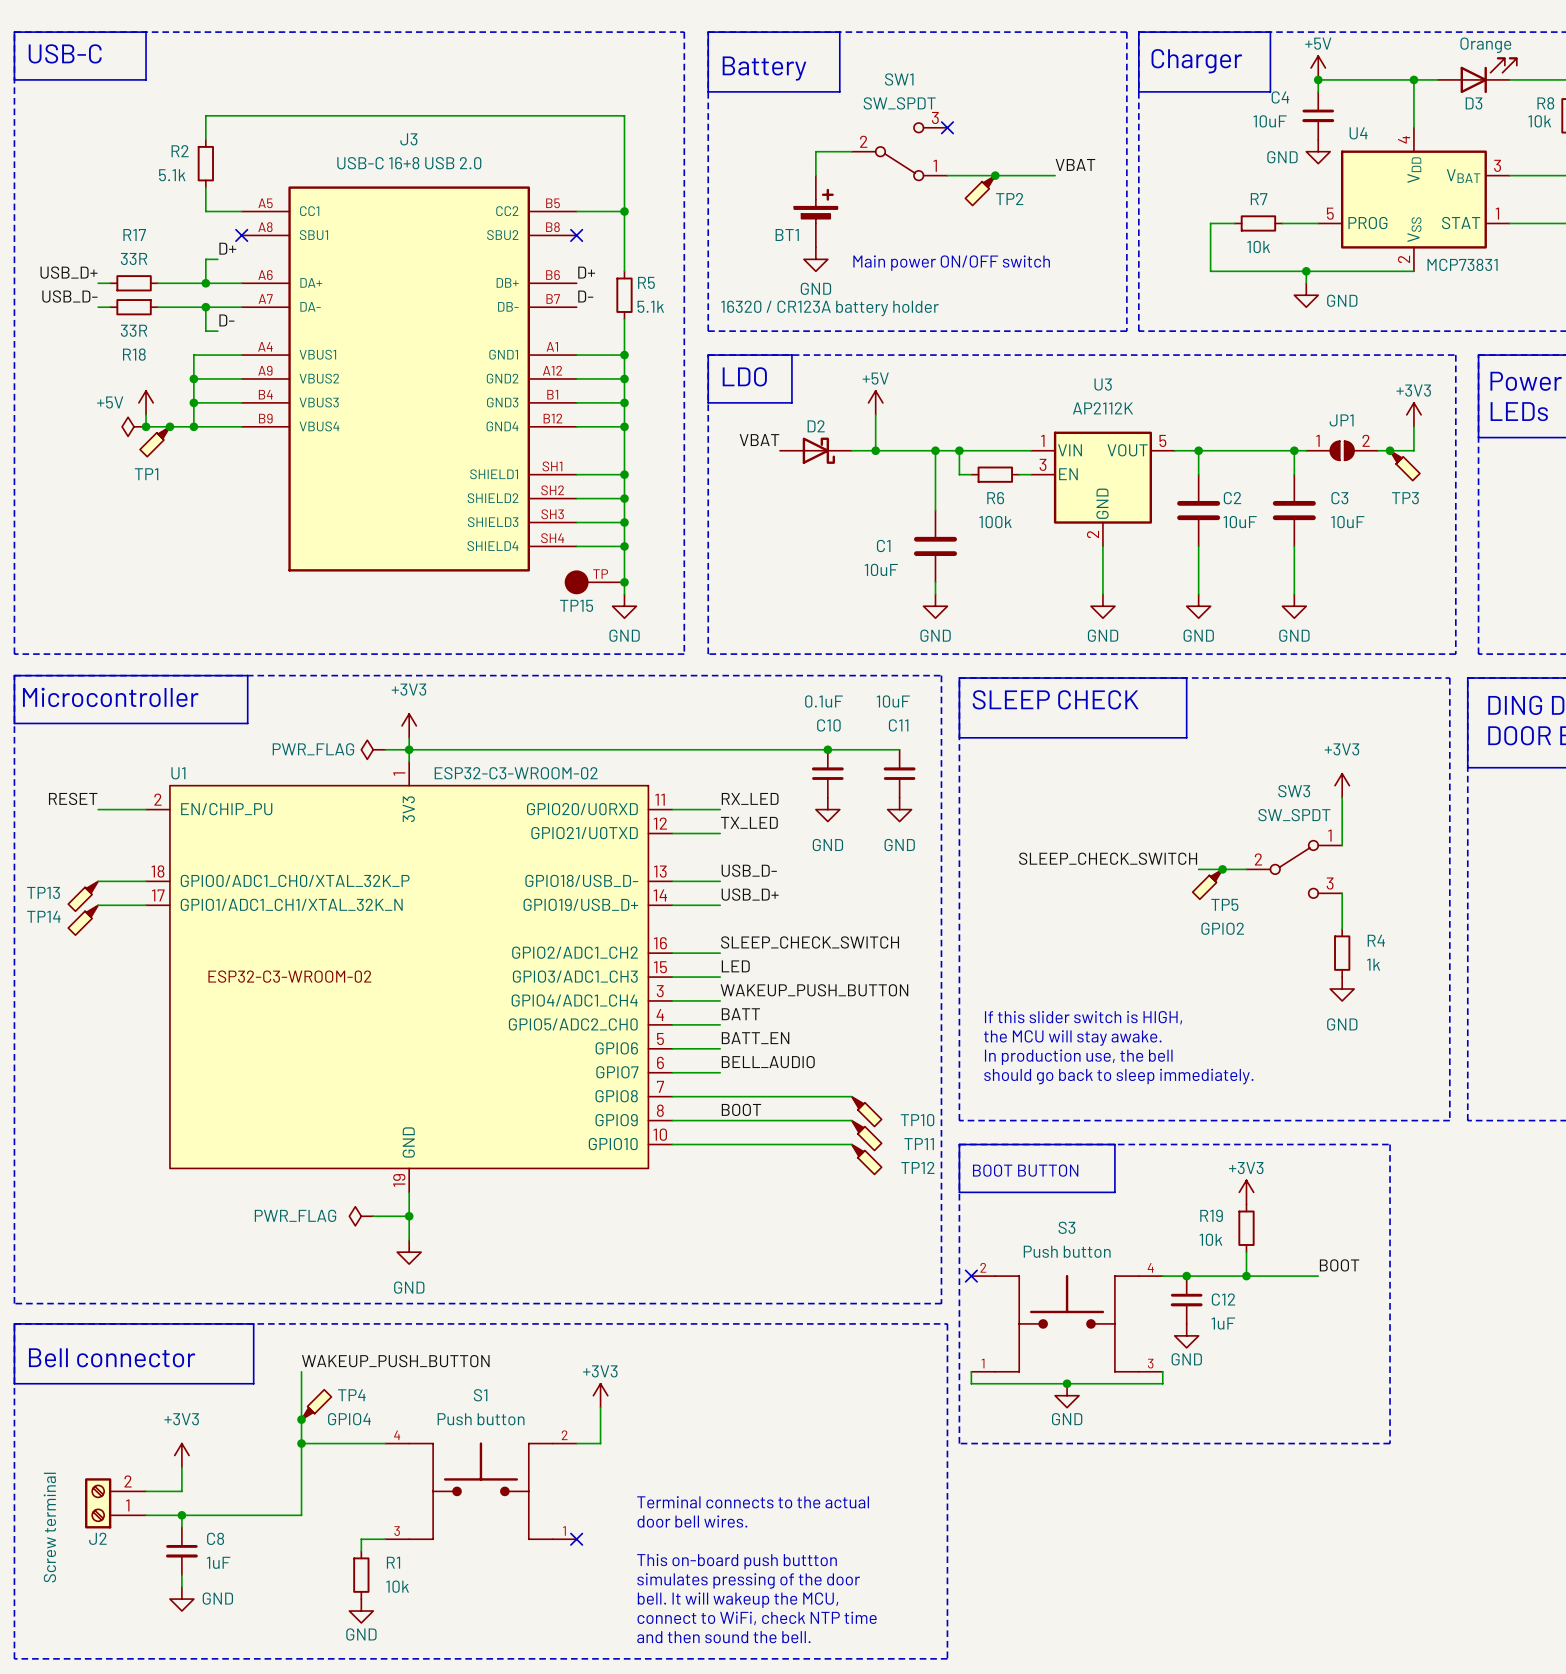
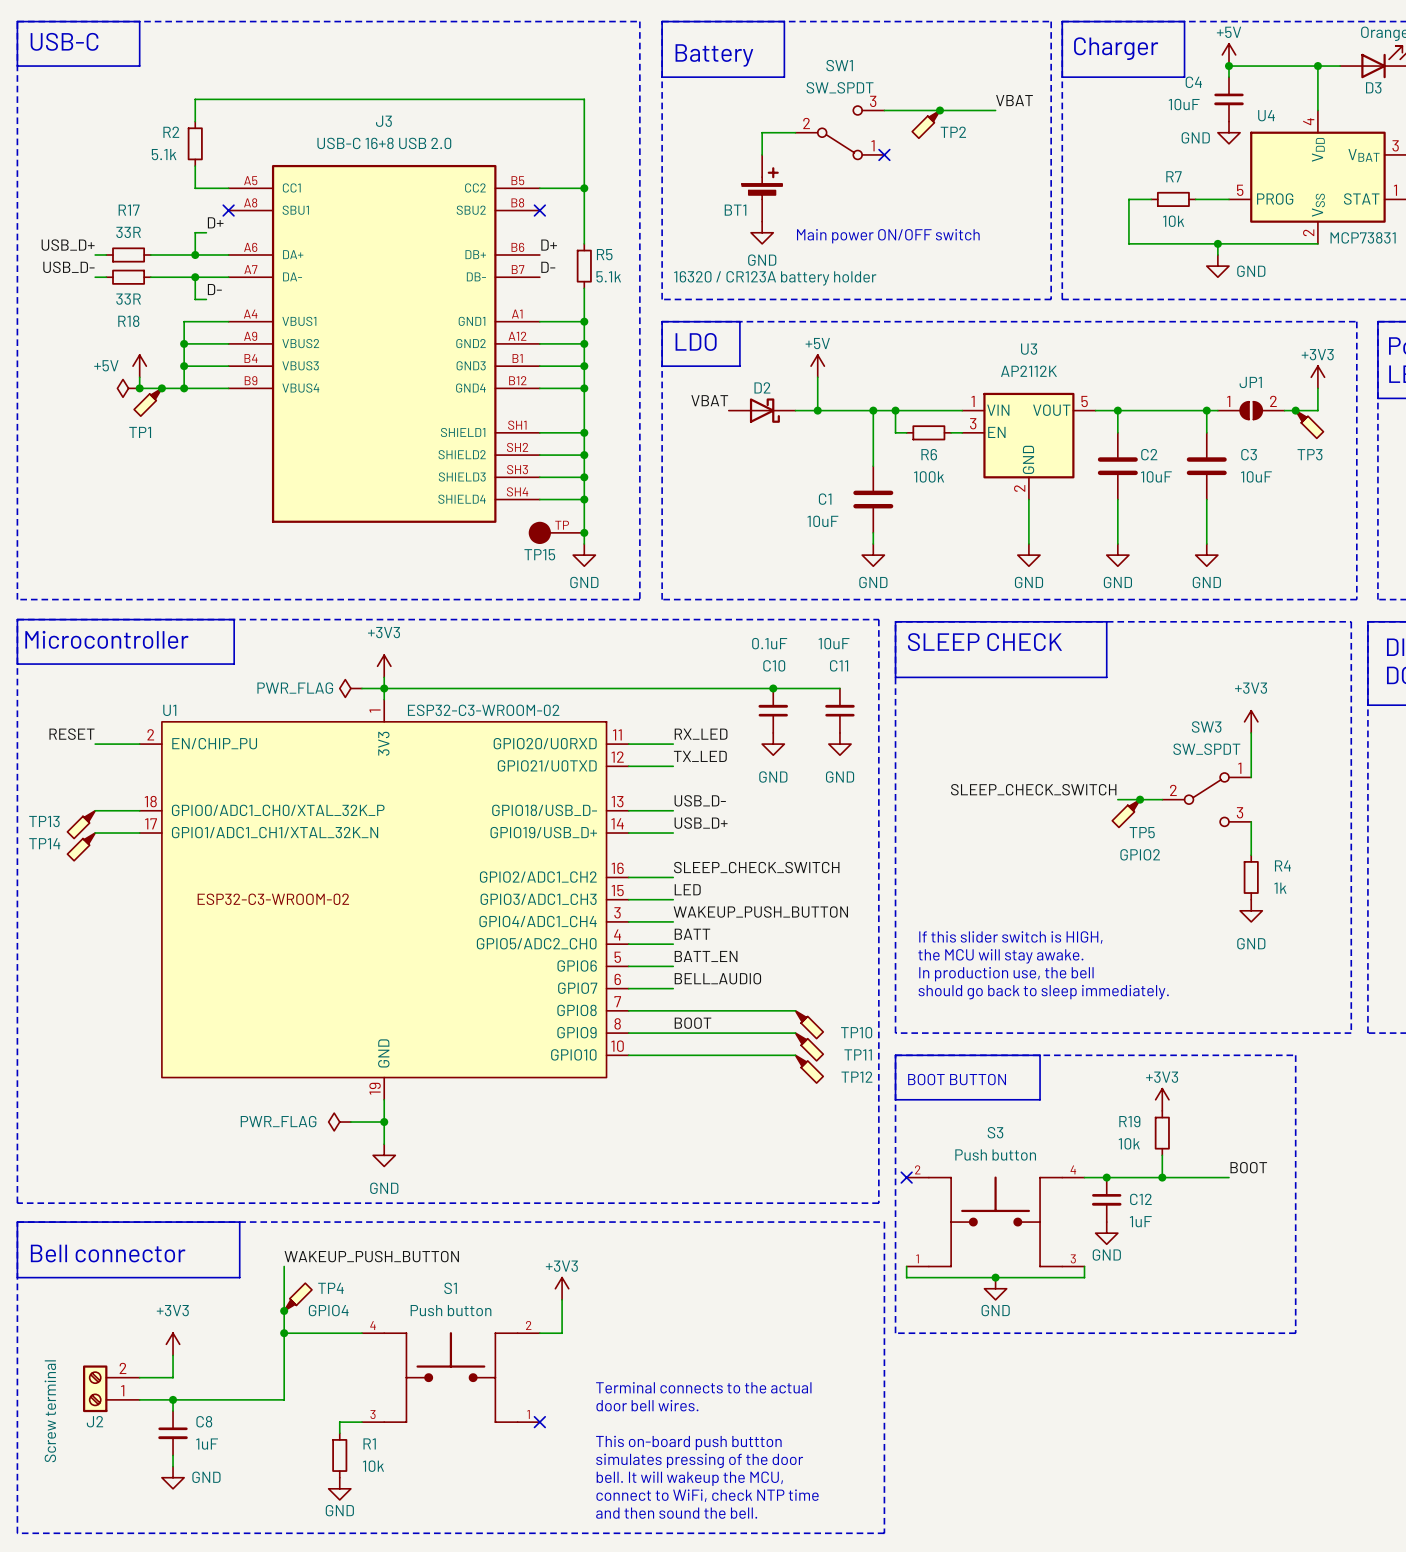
wire: none -> (884, 110) (995, 110)
no-connect mark position: (947, 127) -> (884, 154)
label position: VBAT (1075, 164) -> VBAT (1014, 100)
wire: (947, 175) (1055, 175) -> none
junction position: (995, 175) -> (939, 110)
TP2 position: (980, 190) -> (926, 124)

